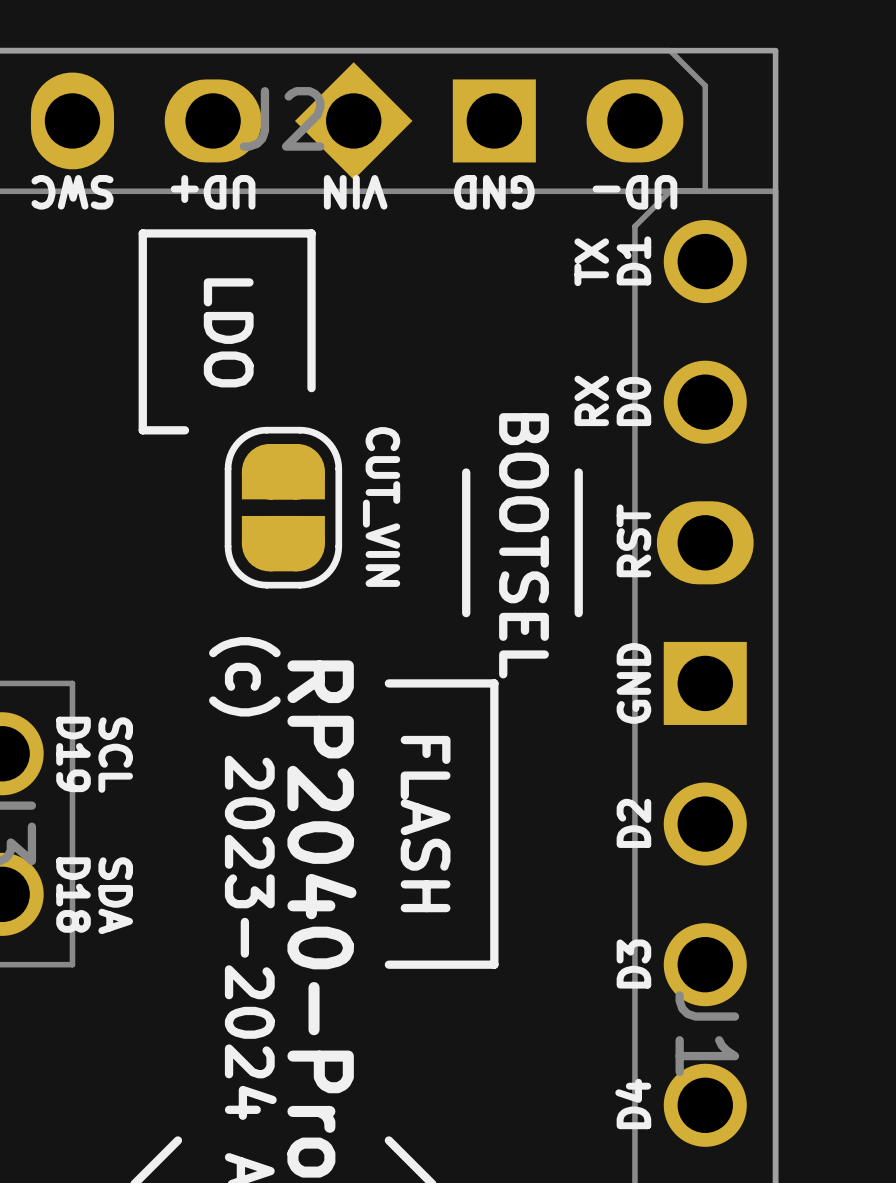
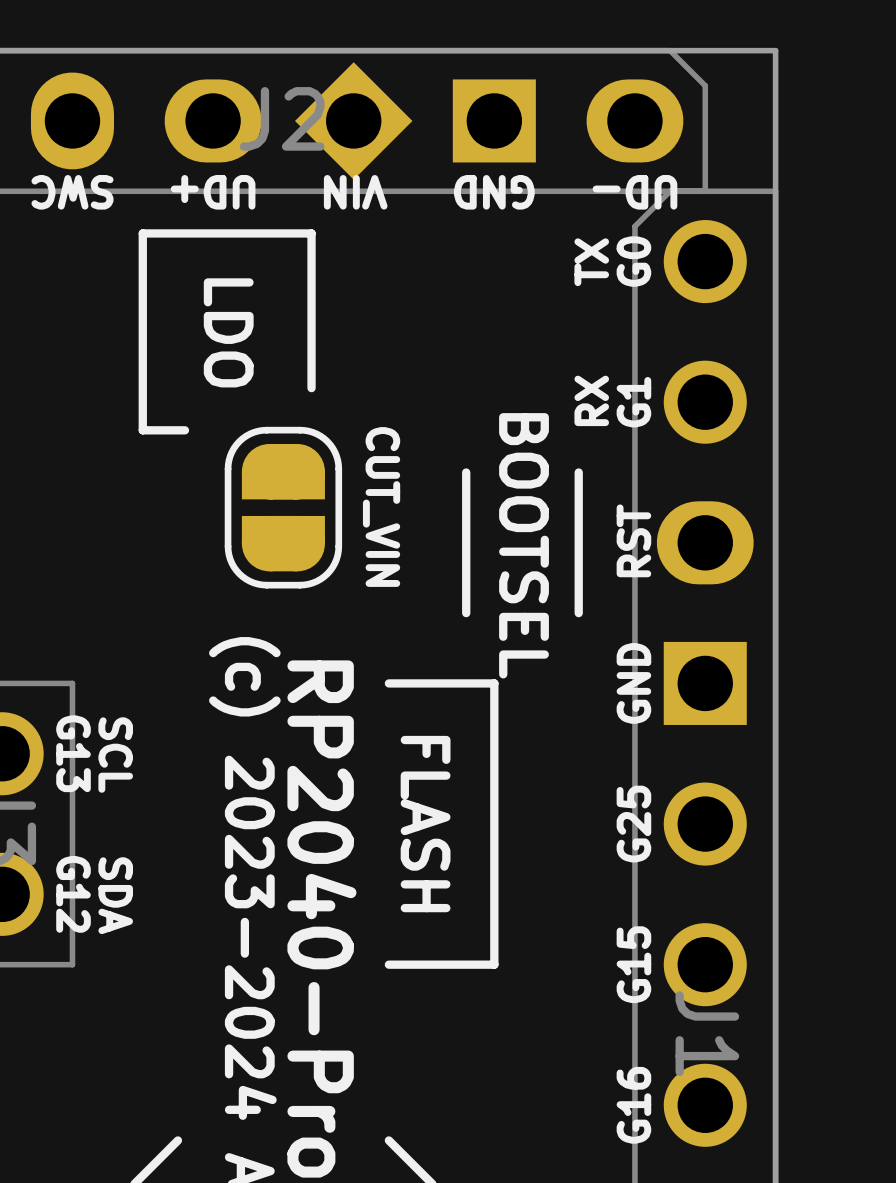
text: D1 (633, 260) -> G0 (633, 261)
text: D0 (633, 401) -> G1 (633, 402)
text: D19 (73, 754) -> G13 (73, 753)
text: D2 (633, 823) -> G25 (633, 824)
text: D18 (73, 895) -> G12 (73, 894)
text: D3 (633, 964) -> G15 (633, 964)
text: D4 (633, 1103) -> G16 (633, 1105)

